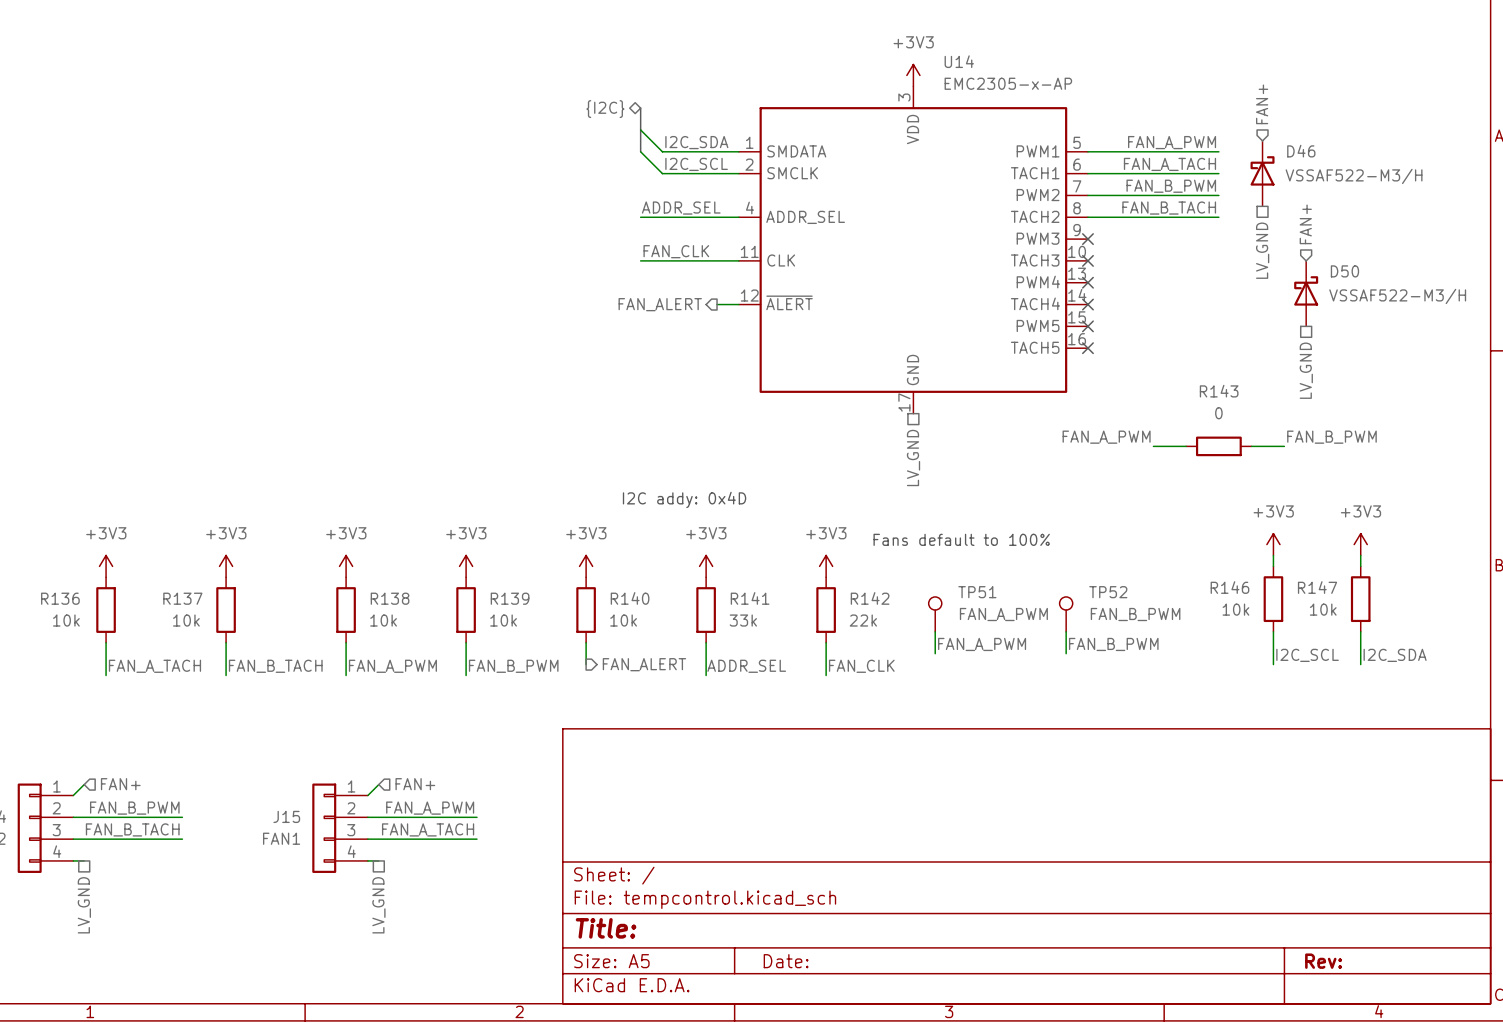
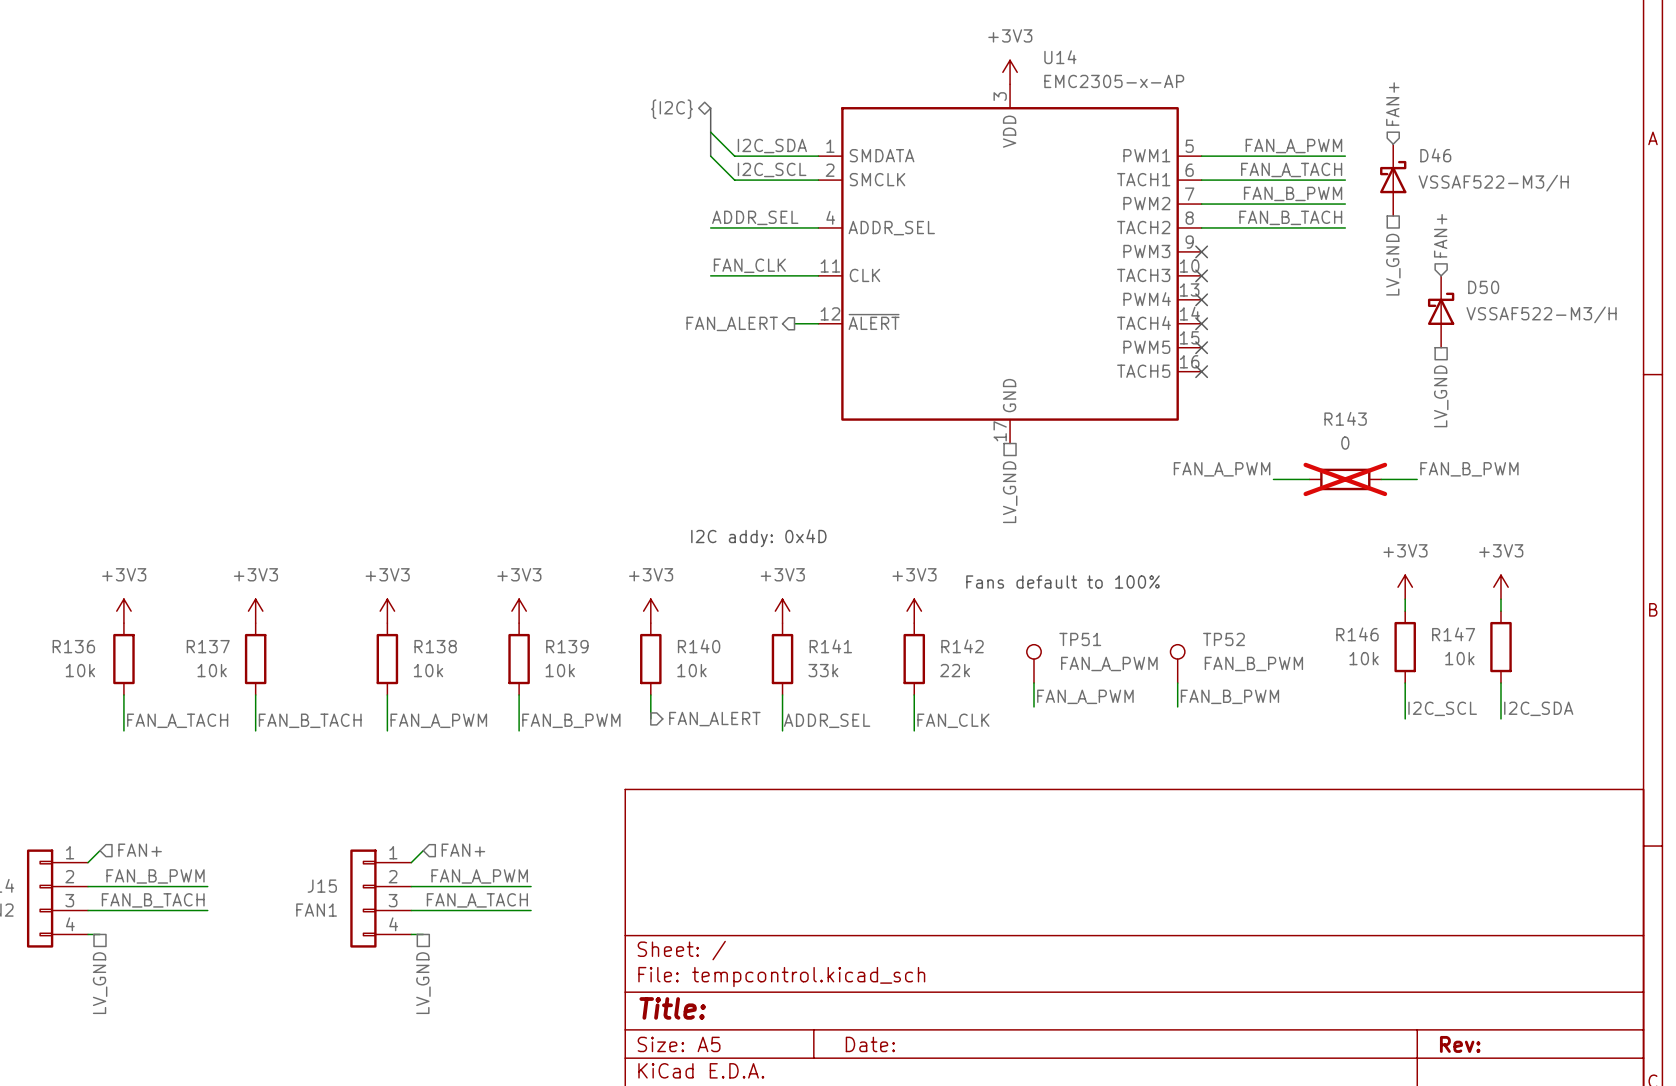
R143 do-not-place cross: none -> (1345, 479)

